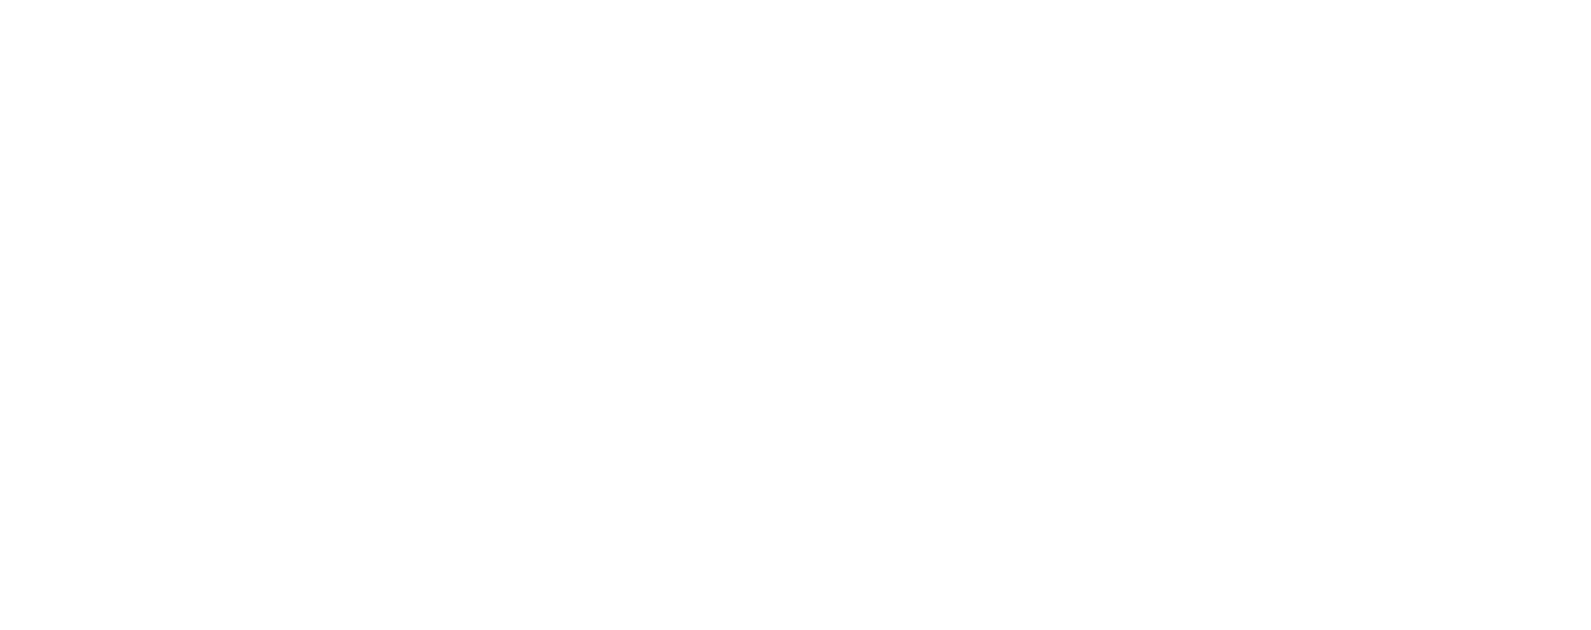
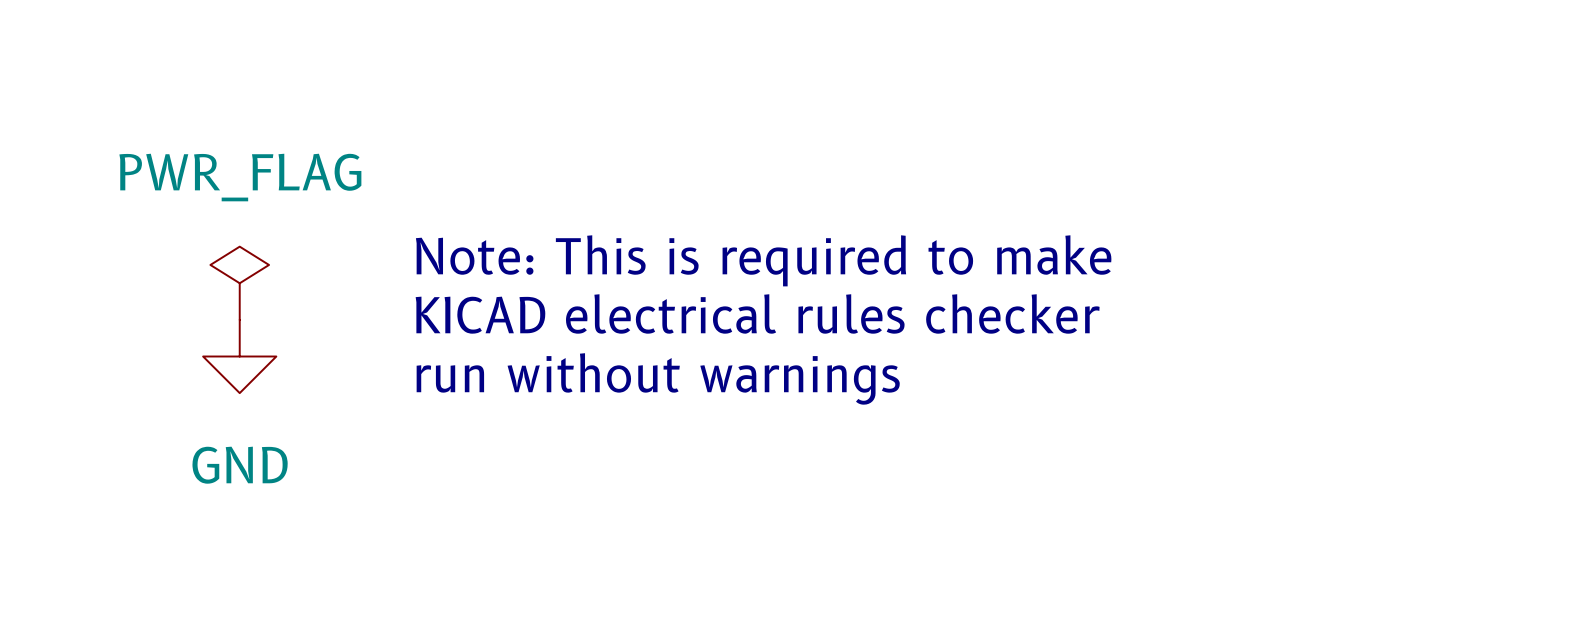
text: none -> Note: This is required to make (763, 260)
power symbol: none -> PWR_FLAG (239, 283)
text: none -> KICAD electrical rules checker (757, 313)
power symbol: none -> GND (239, 356)
text: none -> run without warnings (658, 378)

